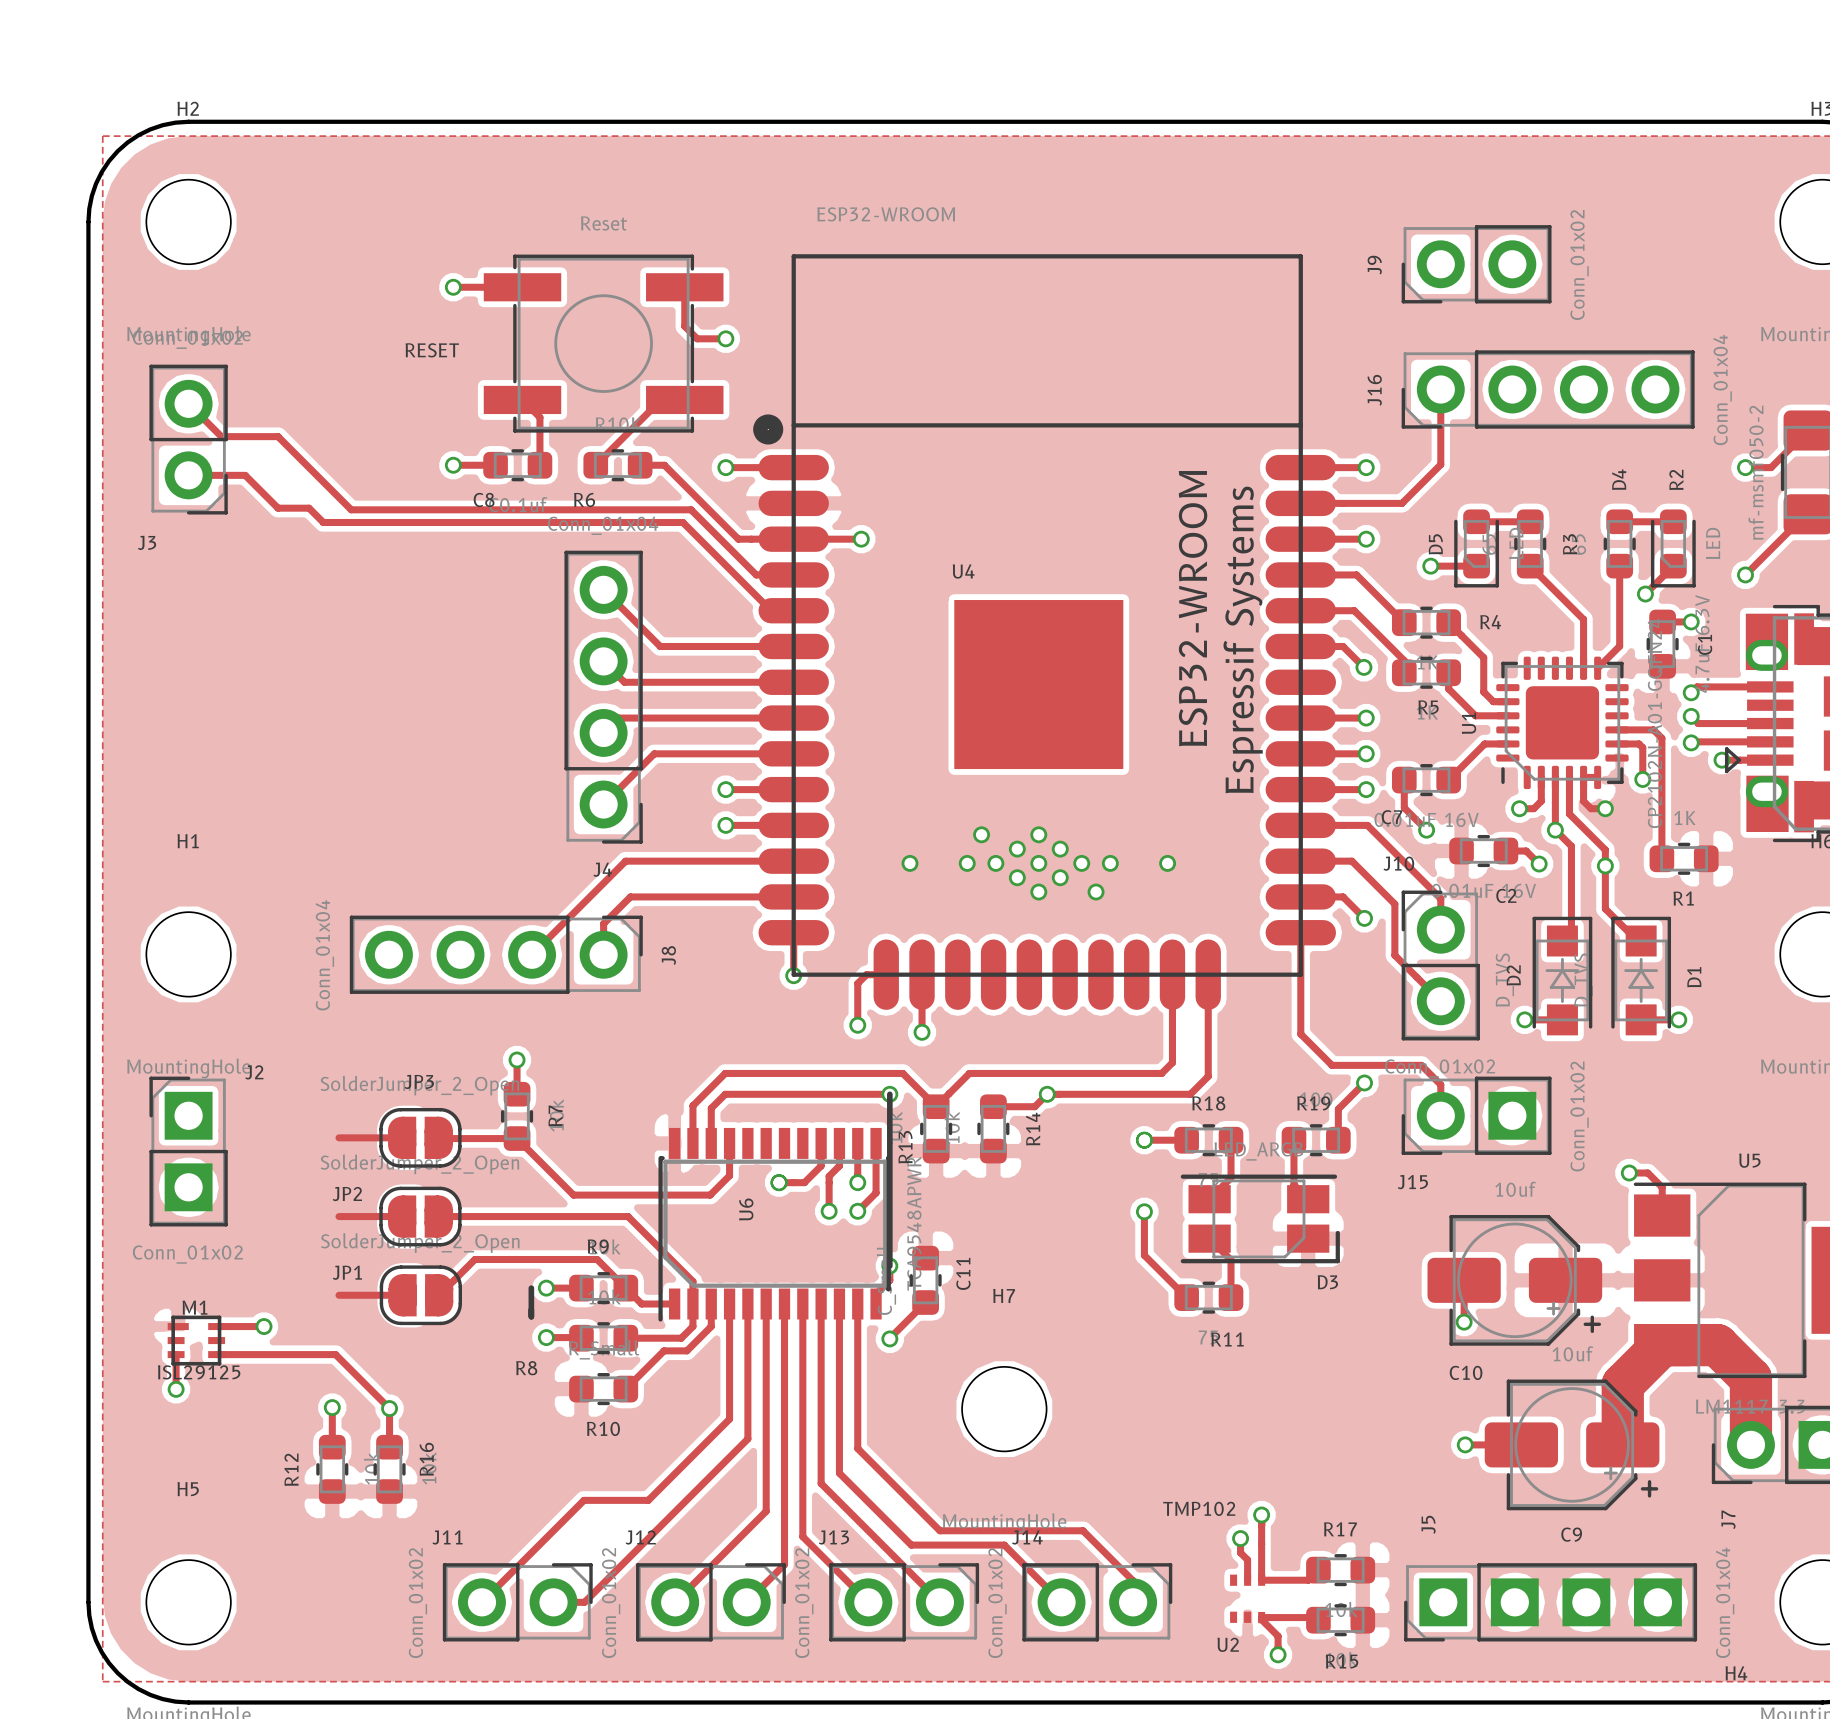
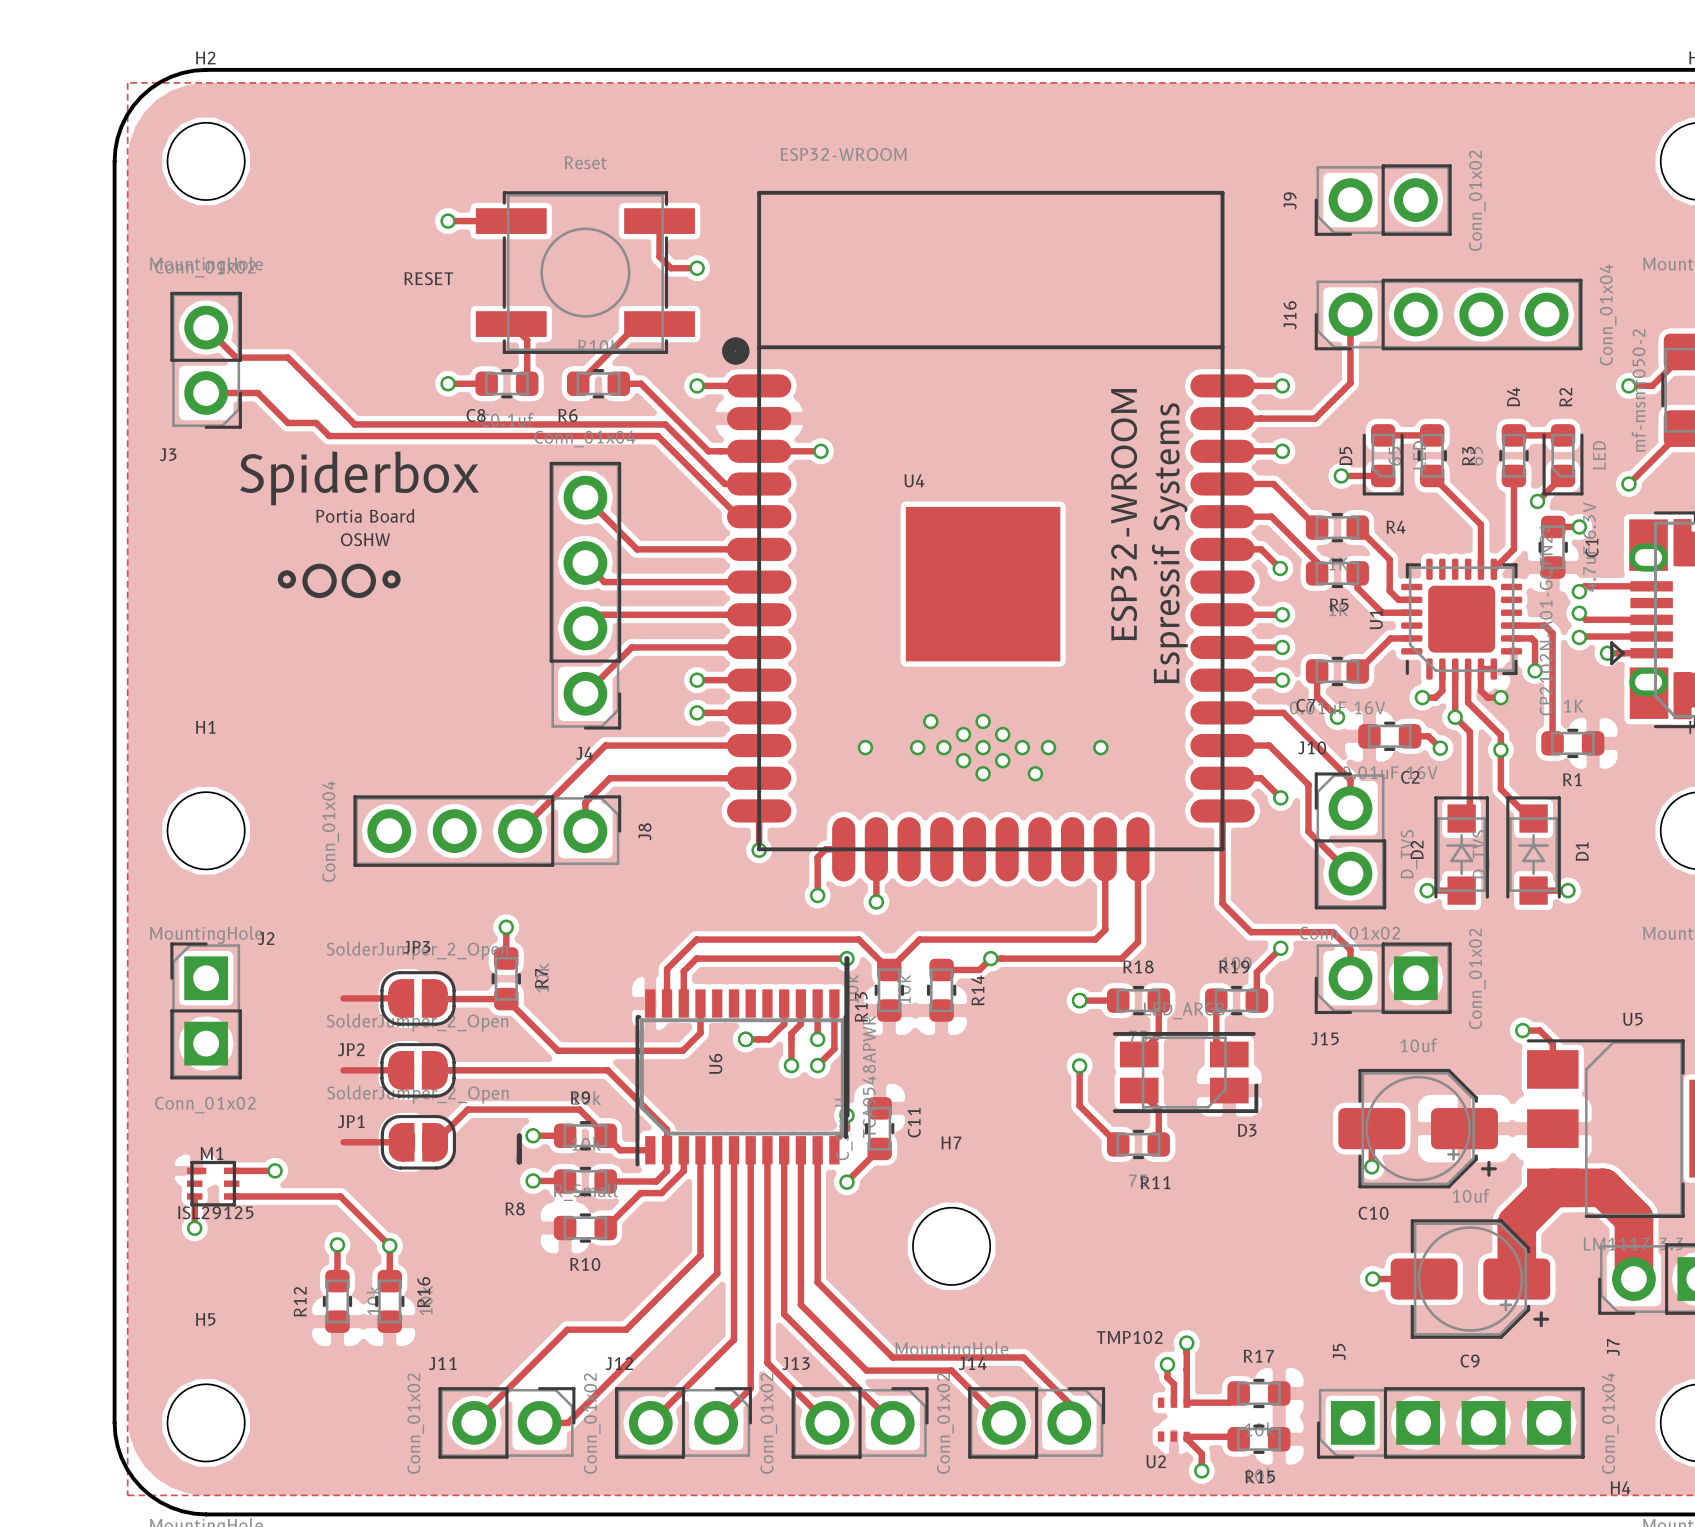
text: none -> Spiderbox (359, 478)
text: none -> Portia Board (365, 515)
text: none -> OSHW (365, 539)
drawing: none -> [277, 563, 401, 599]

